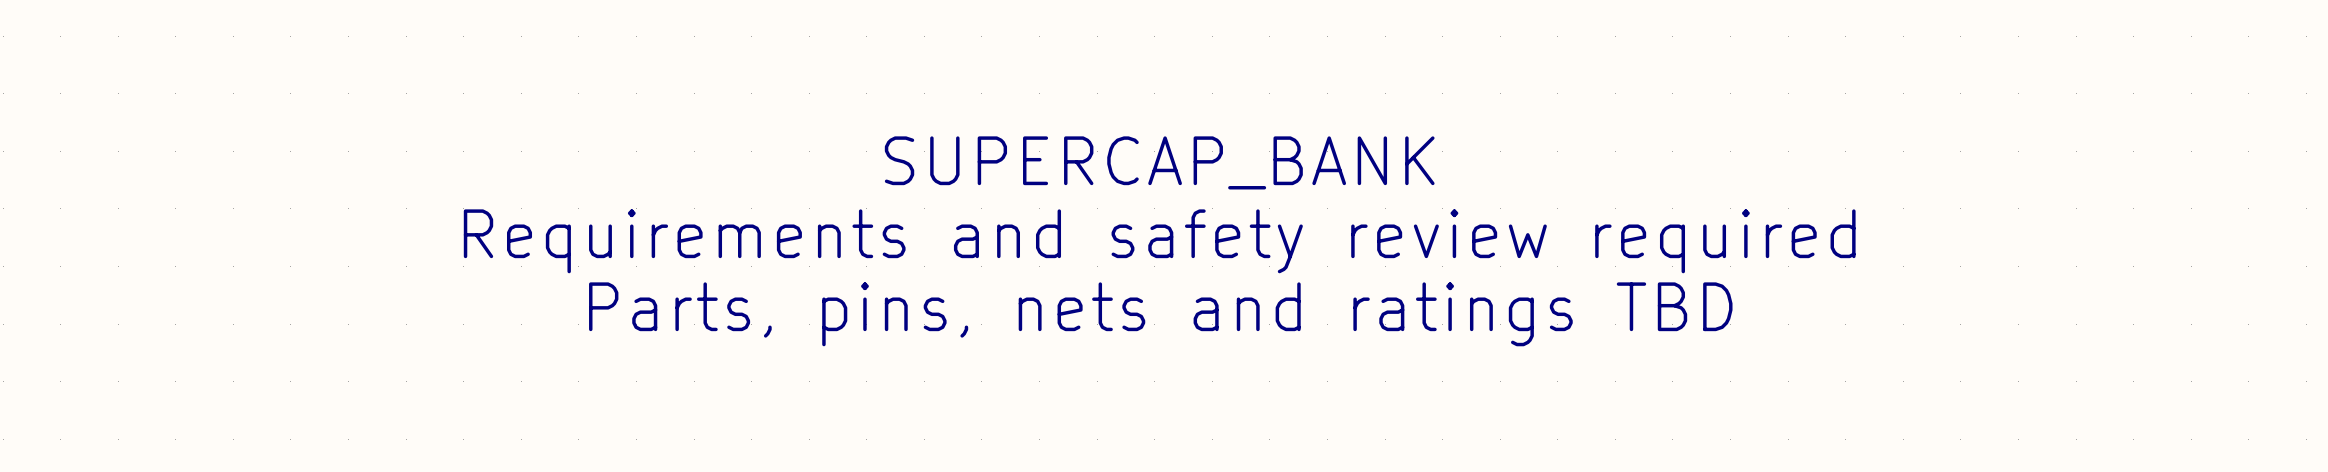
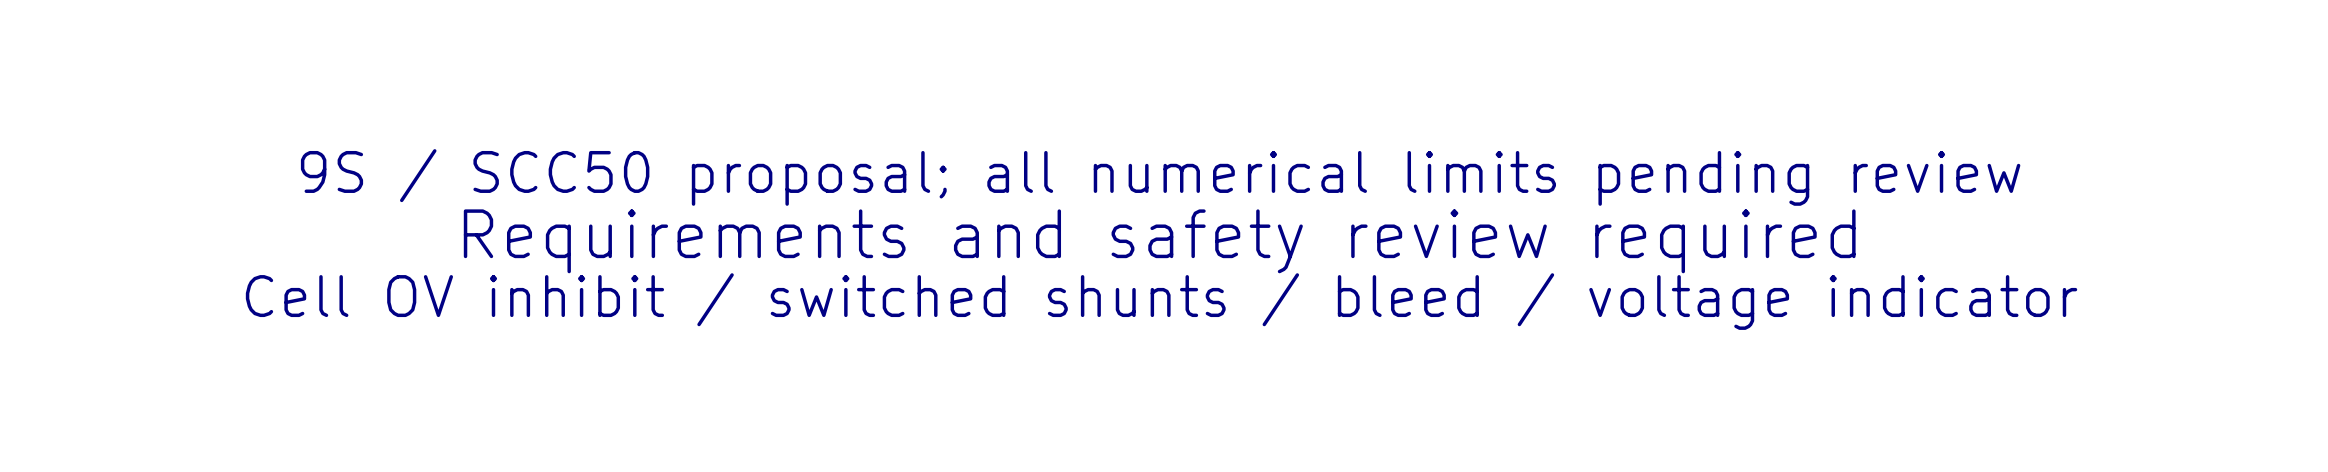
text: SUPERCAP_BANK (1159, 162) -> 9S / SCC50 proposal; all numerical limits pending review (1160, 177)
text: Parts, pins, nets and ratings TBD (1160, 314) -> Cell OV inhibit / switched shunts / bleed / voltage indicator (1161, 301)

